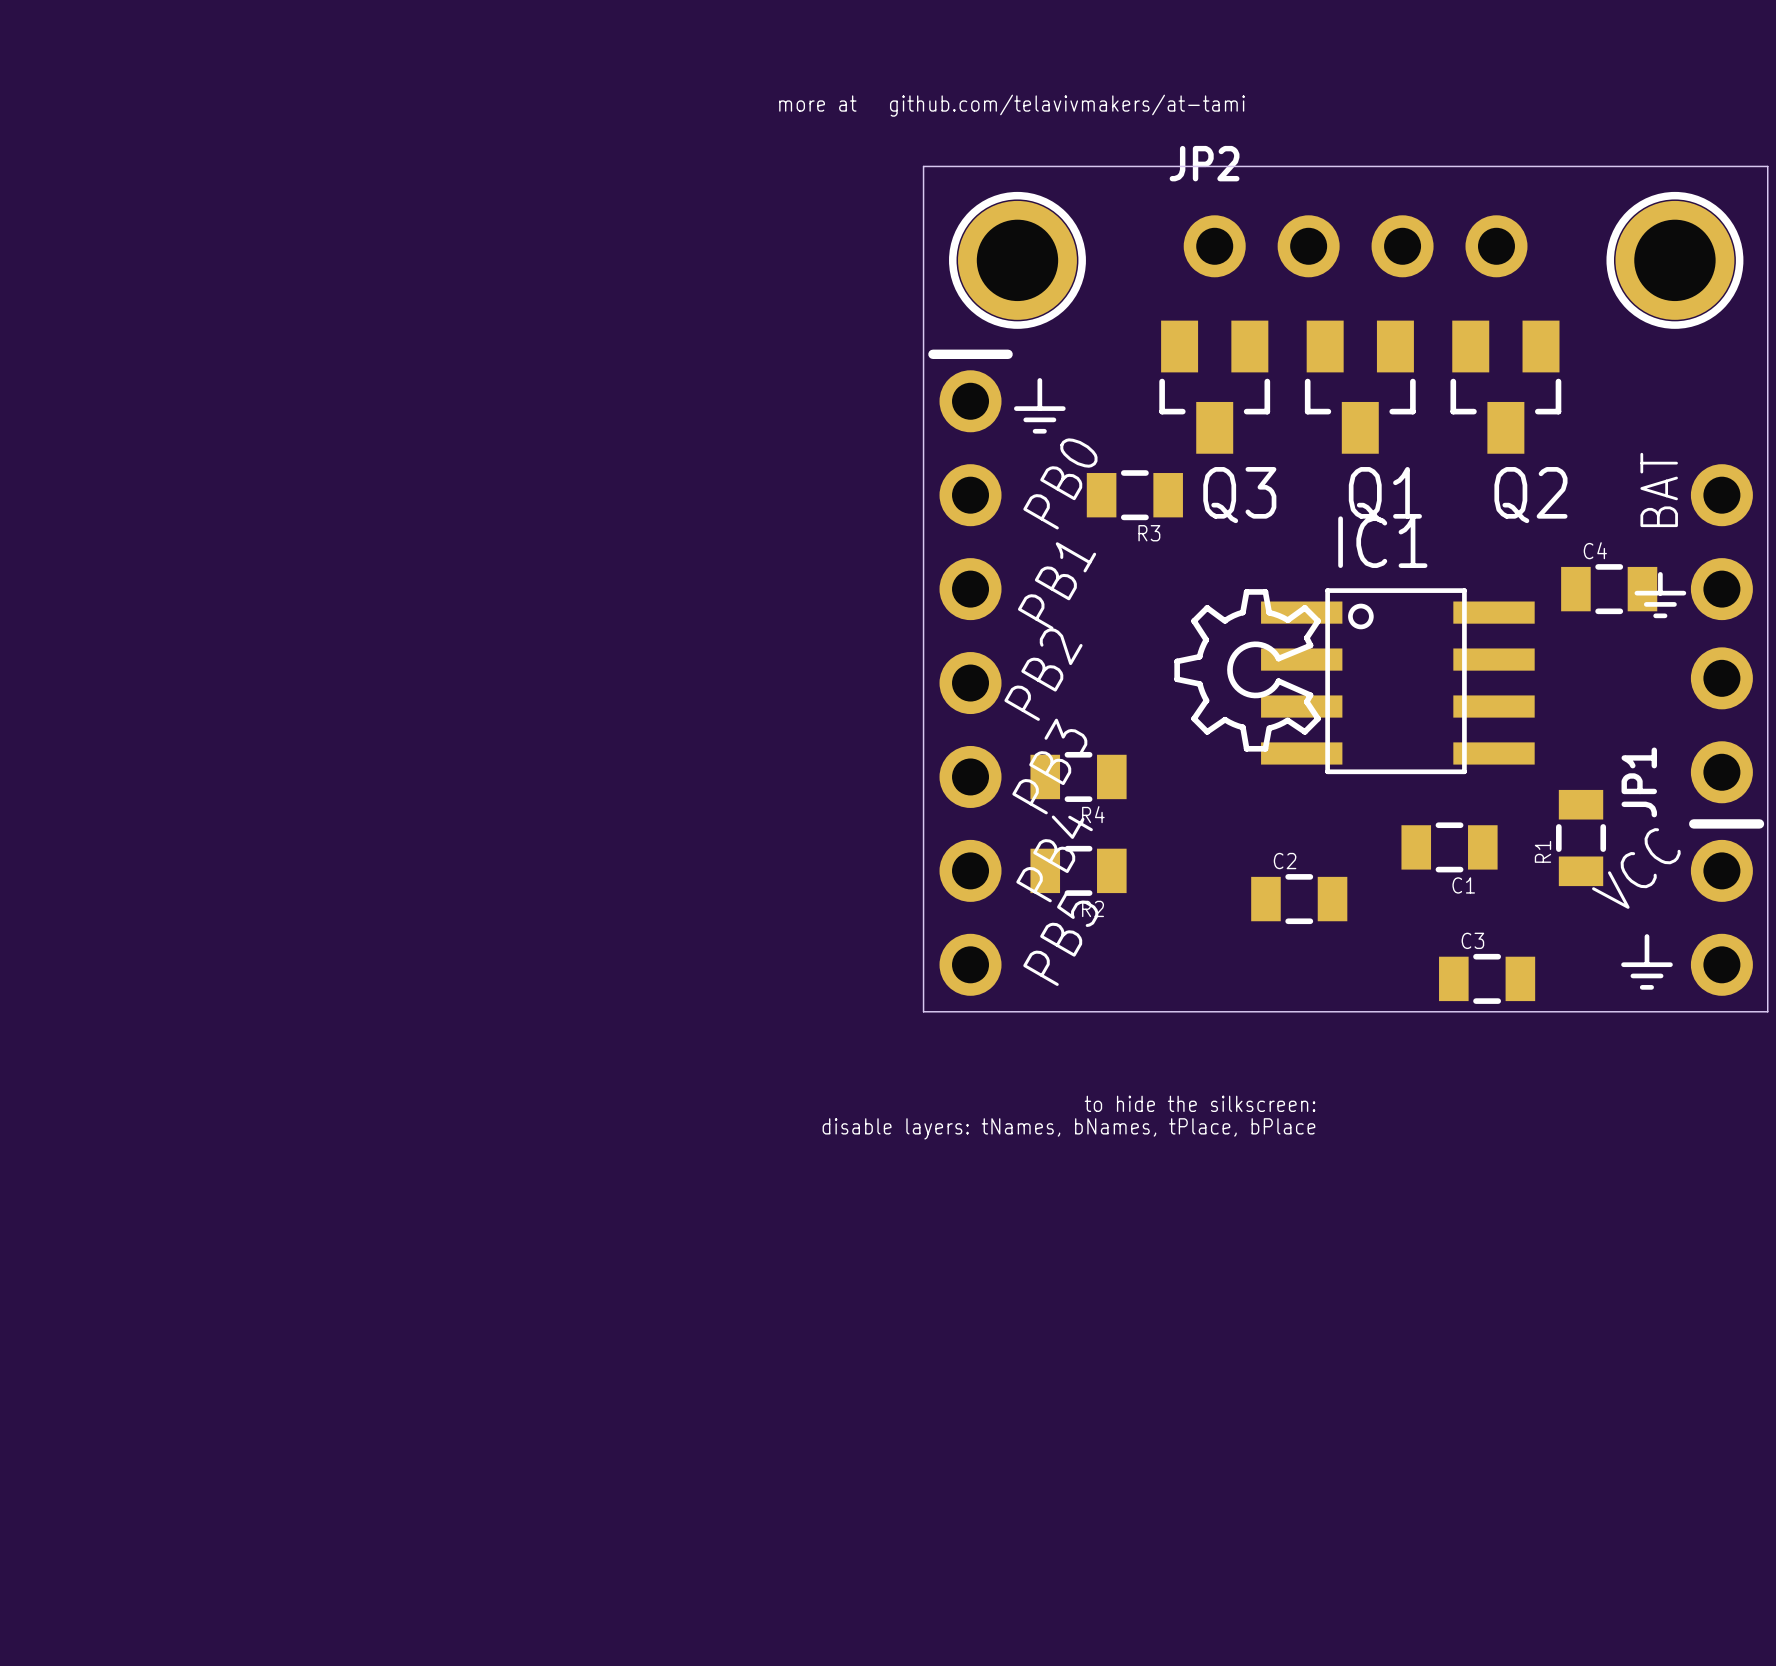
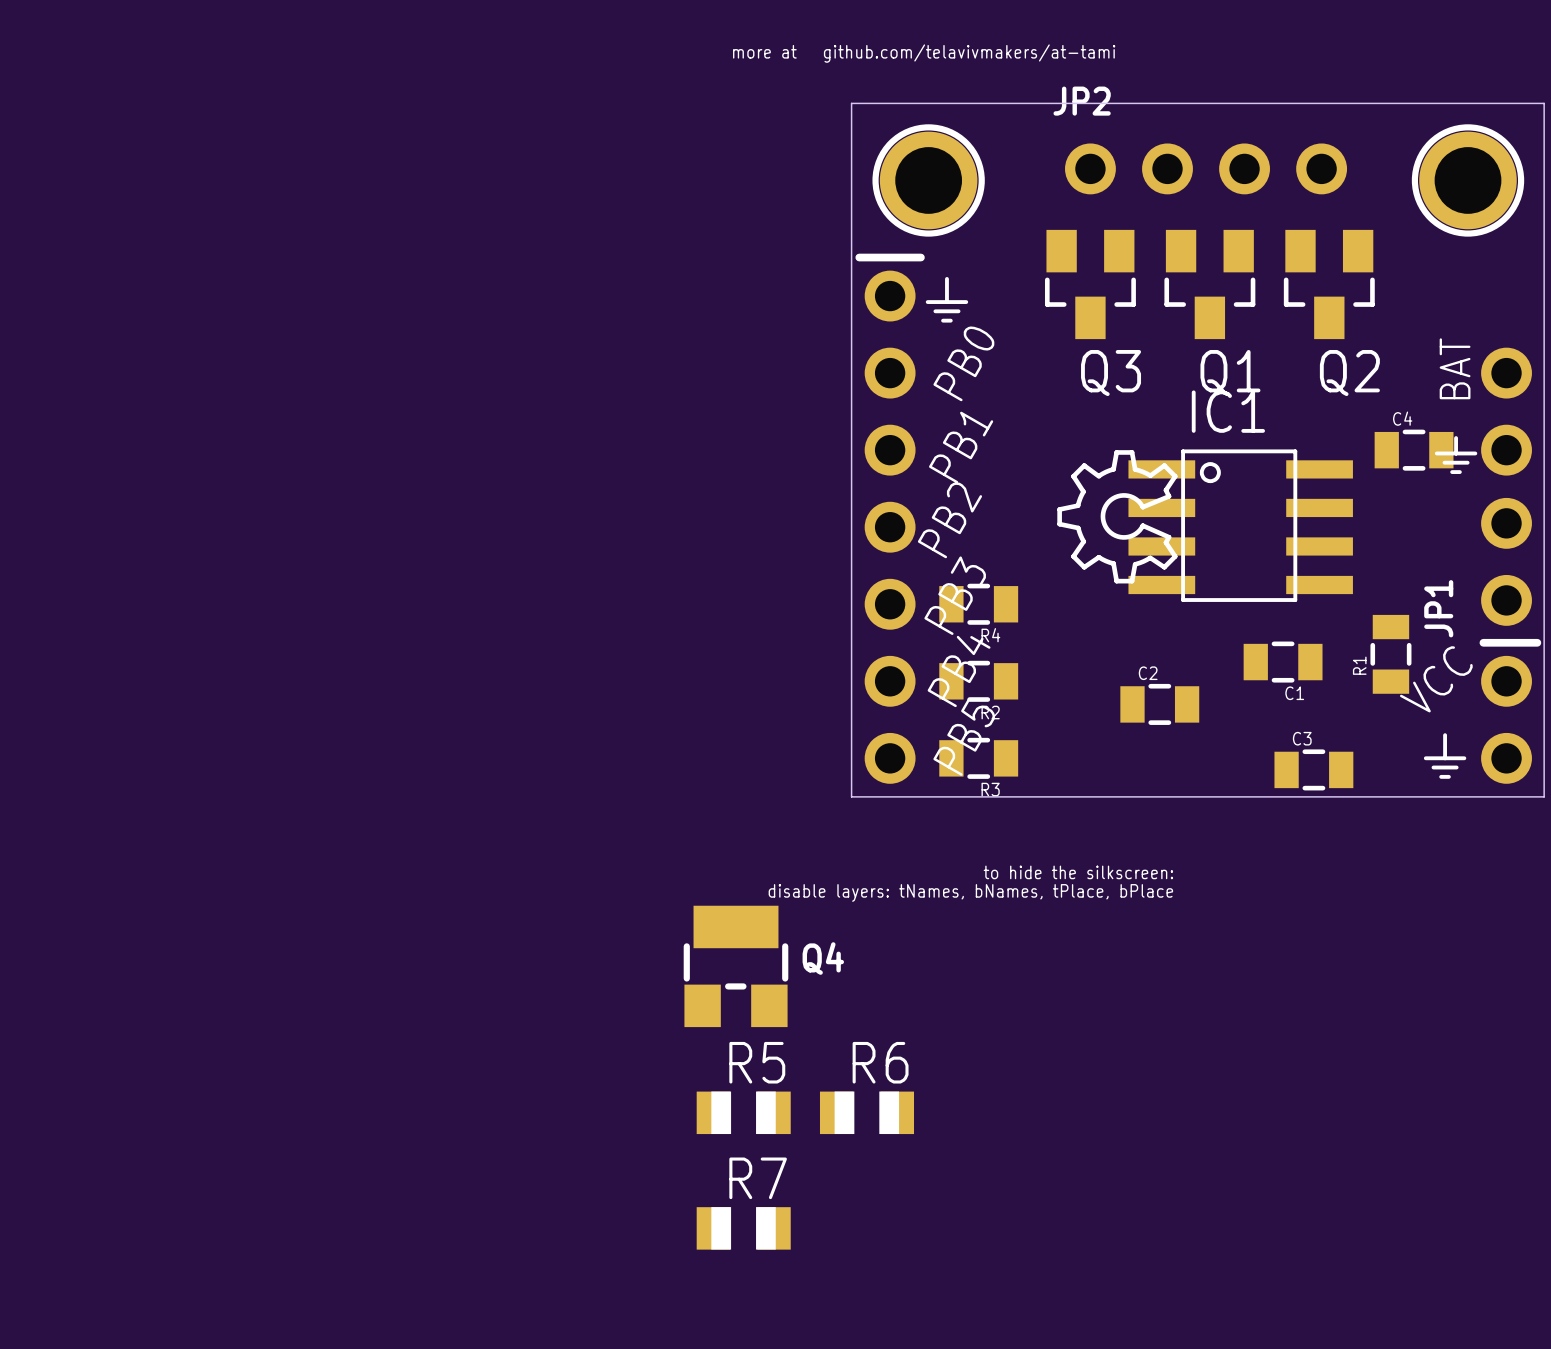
R3 position: (1134, 495) -> (978, 758)
Q4: none -> (736, 966)
R5: none -> (743, 1112)
R6: none -> (866, 1112)
R7: none -> (743, 1228)

